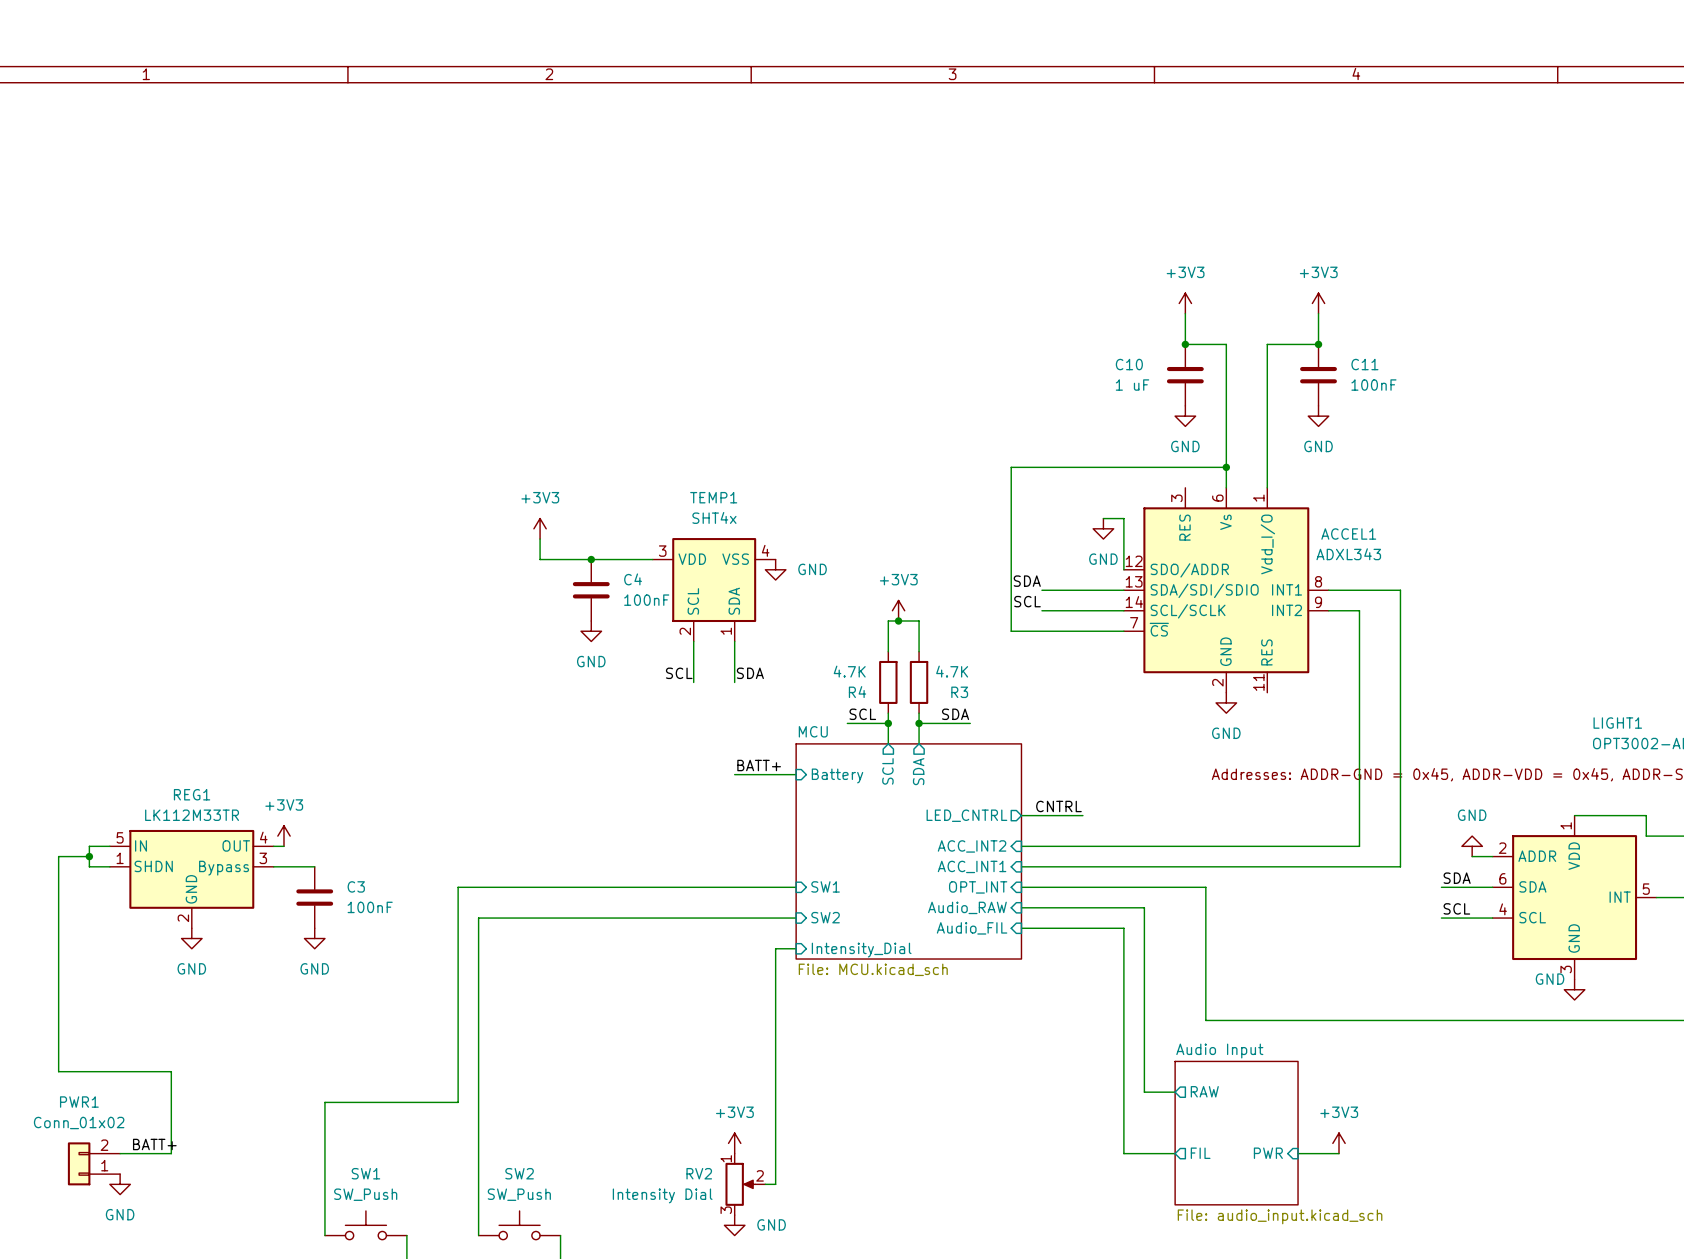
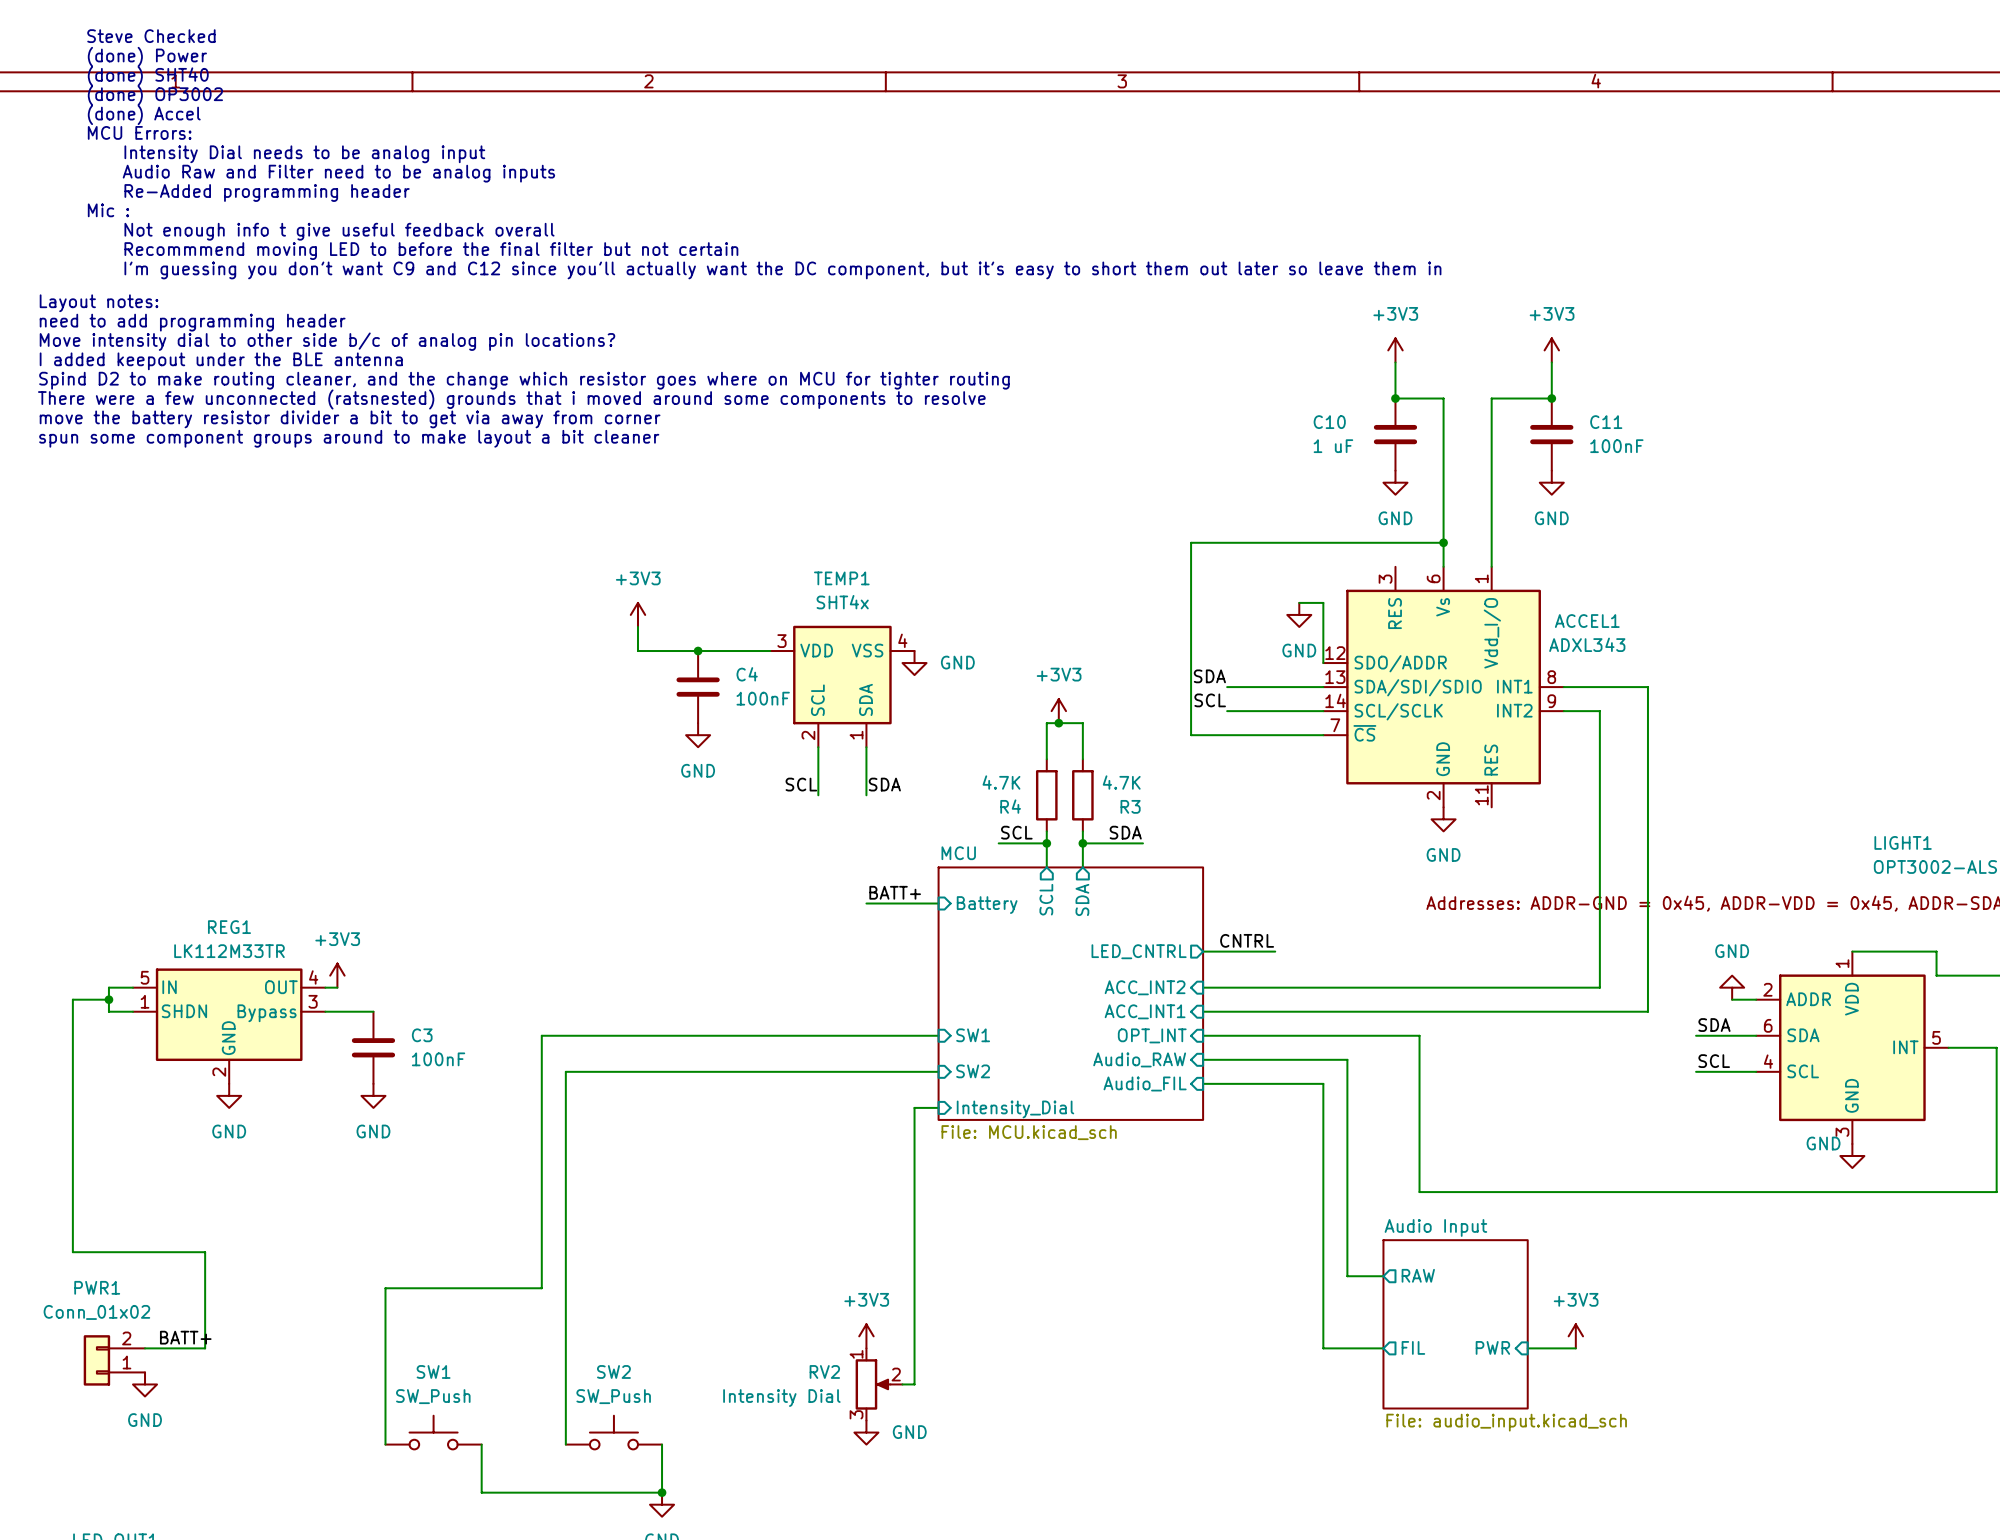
text: none -> Steve Checked (151, 36)
text: none -> (done) Power (147, 56)
text: none -> (done) SHT40 (148, 76)
text: none -> (done) OP3002 (155, 95)
text: none -> (done) Accel (144, 114)
text: none -> MCU Errors: (139, 132)
text: none -> Intensity Dial needs to be analog input (304, 154)
text: none -> Audio Raw and Filter need to be analog inputs (338, 173)
text: none -> Re-Added programming header (267, 193)
text: none -> Mic : (108, 210)
text: none -> Not enough info t give useful feedback overall (339, 231)
text: none -> Recommmend moving LED to before the final filter but not certain (431, 251)
text: none -> I'm guessing you don't want C9 and C12 since you'll actually want the DC component, but it's easy to short them out later so leave them in (782, 270)
text: none -> Layout notes: (99, 303)
text: none -> need to add programming header (192, 322)
text: none -> Move intensity dial to other side b/c of analog pin locations? (327, 341)
text: none -> I added keepout under the BLE antenna (221, 361)
text: none -> Spind D2 to make routing cleaner, and the change which resistor goes where on MCU for tighter routing (524, 380)
text: none -> There were a few unconnected (ratsnested) grounds that i moved around some components to resolve (511, 399)
text: none -> move the battery resistor divider a bit to get via away from corner (350, 419)
text: none -> spun some component groups around to make layout a bit cleaner (349, 438)

